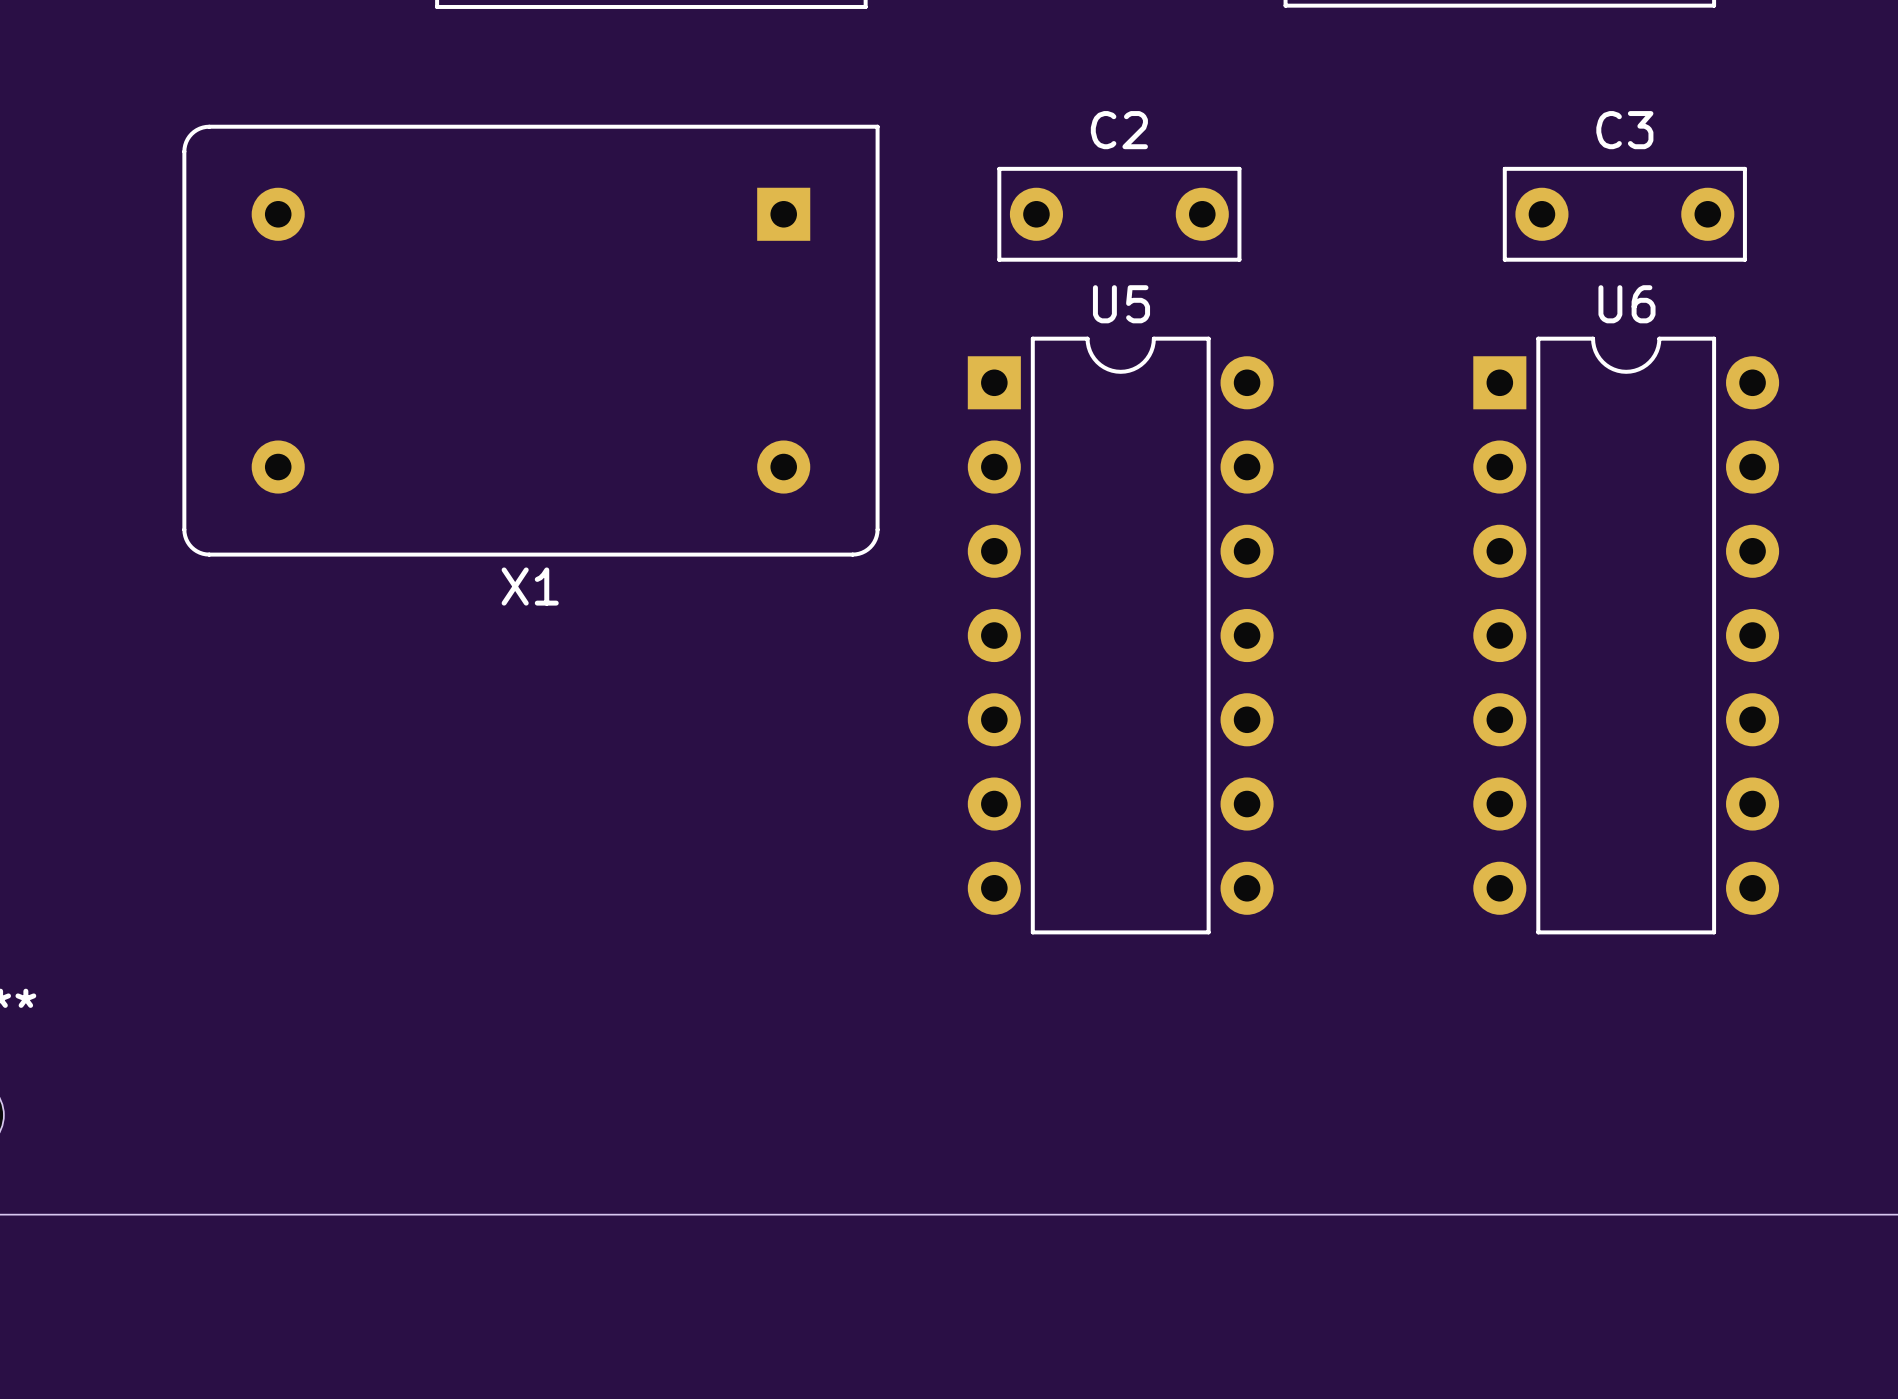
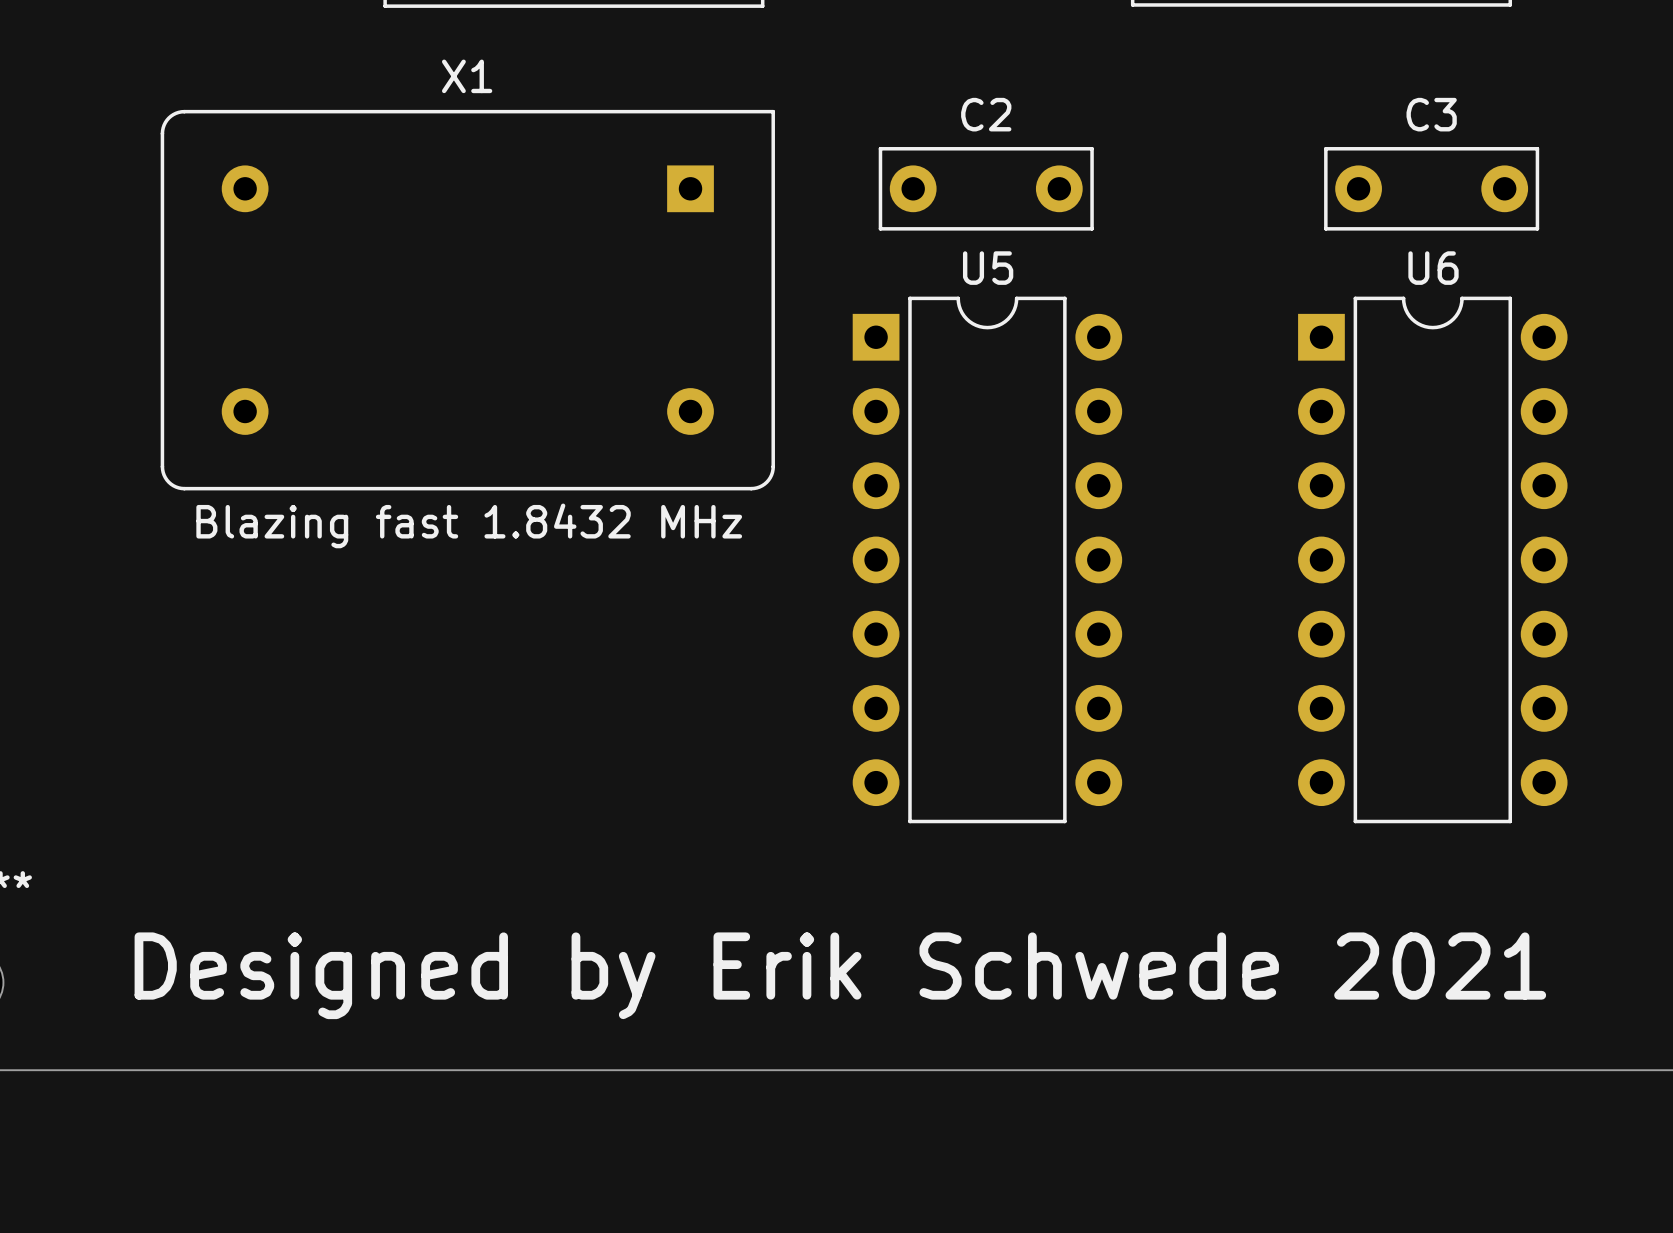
X1 name position: X1 (530, 586) -> X1 (467, 76)
text: none -> Blazing fast 1.8432 MHz (469, 525)
text: none -> Designed by Erik Schwede 2021 (840, 975)

